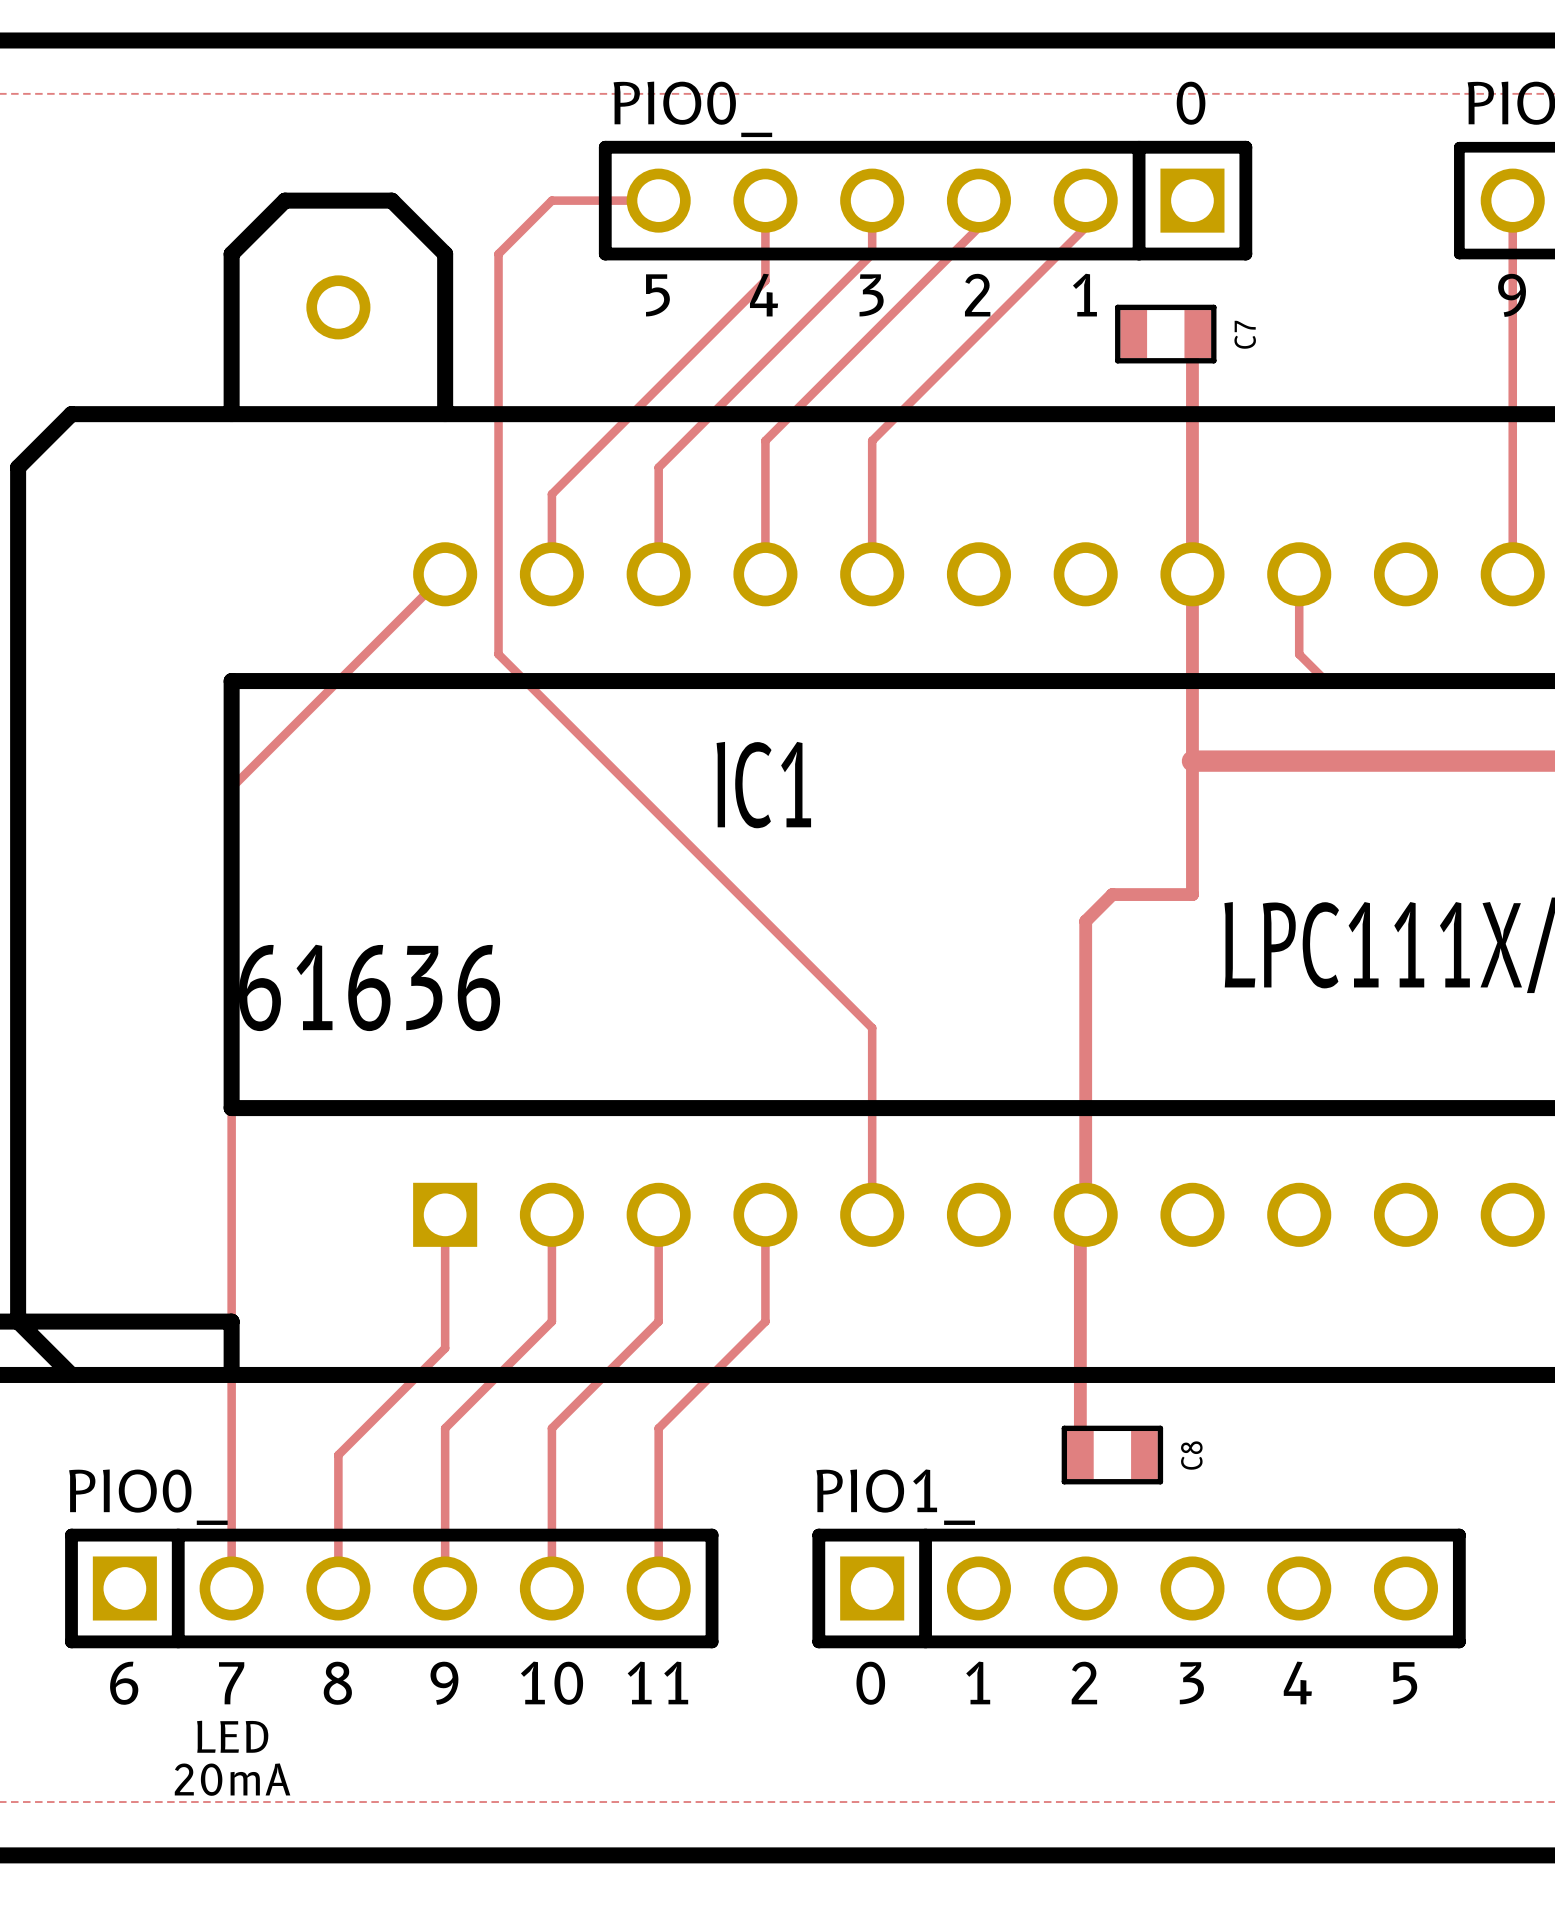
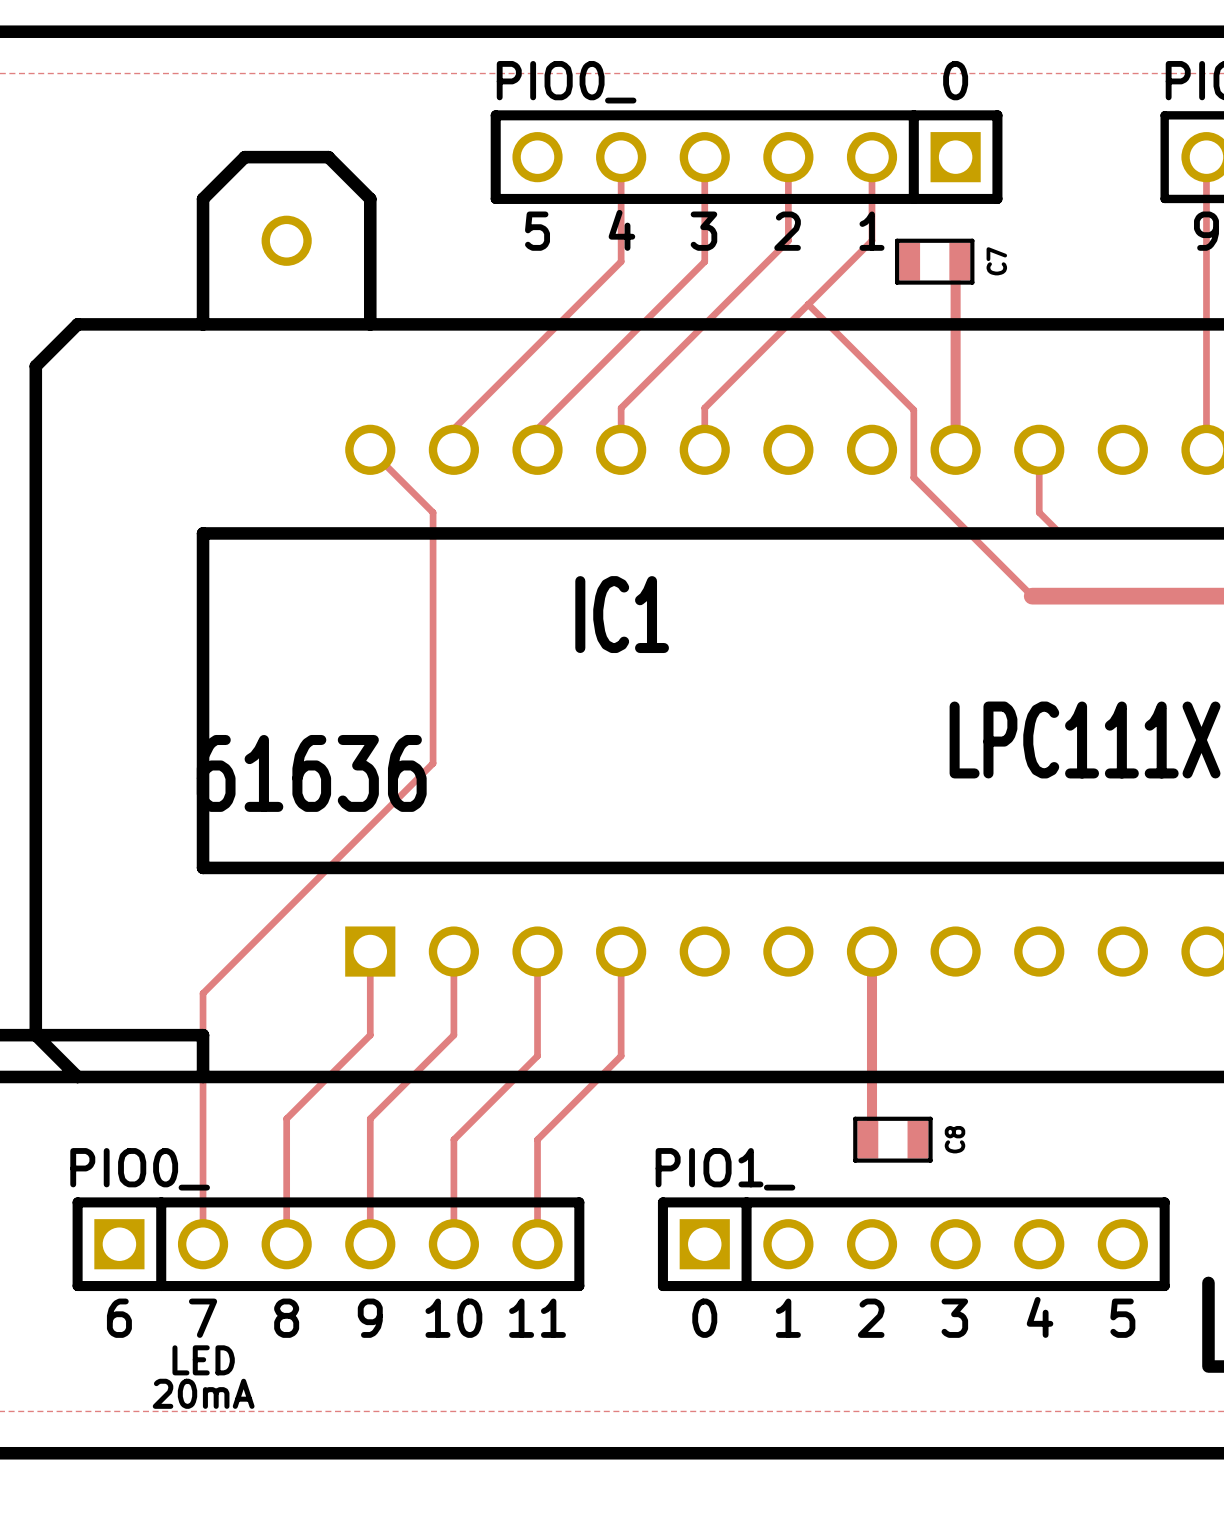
track: (658, 200) (551, 200) (498, 254) (498, 654) (872, 1028) (872, 1214) -> none
track: (978, 227) (872, 334) -> (704, 198) (704, 261)
track: none -> (788, 178) (788, 240) (621, 408)
track: (1085, 227) (872, 440) (872, 520) -> (872, 178) (872, 240) (704, 408)
track: (872, 254) (658, 467) (658, 547) -> none
track: (765, 280) (551, 494) (551, 547) -> (621, 219) (621, 261) (453, 428)
track: (765, 440) (765, 520) -> (621, 345) (537, 428)
track: (445, 574) (231, 787) (231, 1268) -> (370, 449) (433, 512) (433, 763) (203, 993)
track: (1192, 574) (1192, 894) (1112, 894) (1085, 921) (1085, 1214) (1080, 1220) (1080, 1455) -> (872, 951) (872, 1135) (867, 1139)
track: (1192, 761) (1290, 761) -> (808, 304) (913, 410) (913, 477) (1032, 596)
track: (445, 1321) (445, 1348) (338, 1455) -> (370, 1035) (286, 1118) (286, 1139)
track: (658, 1321) (551, 1428) (551, 1455) -> (537, 1035) (537, 1056) (453, 1139)
track: (765, 1321) (658, 1428) (658, 1455) -> (621, 1035) (621, 1056) (537, 1139)

